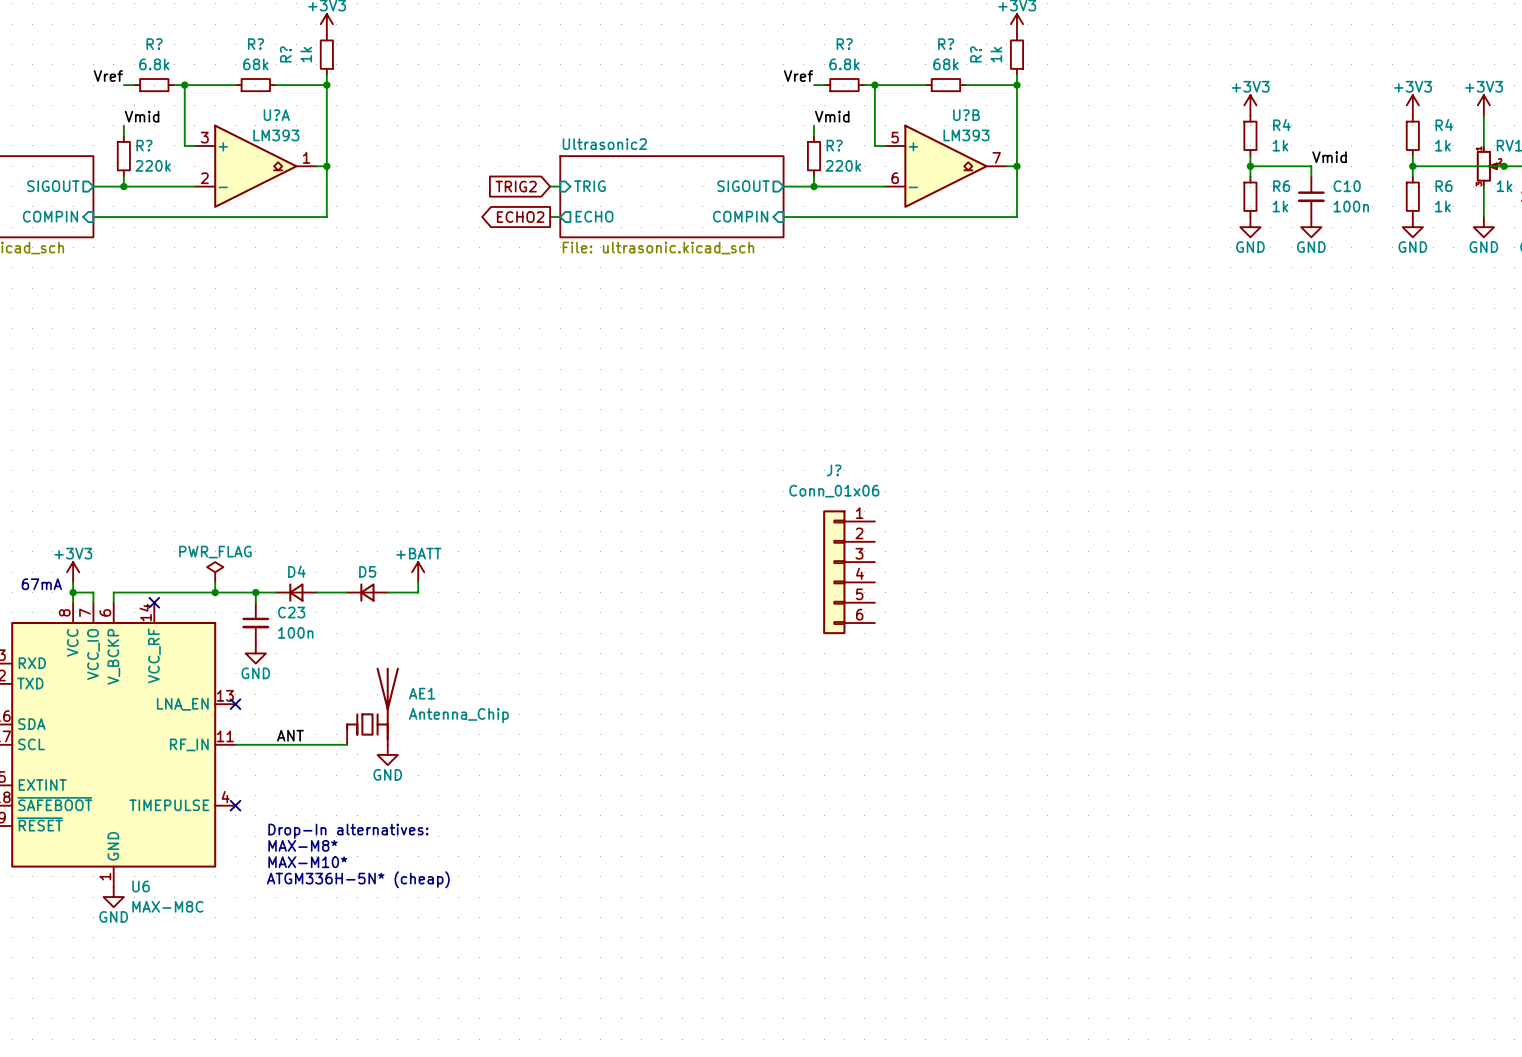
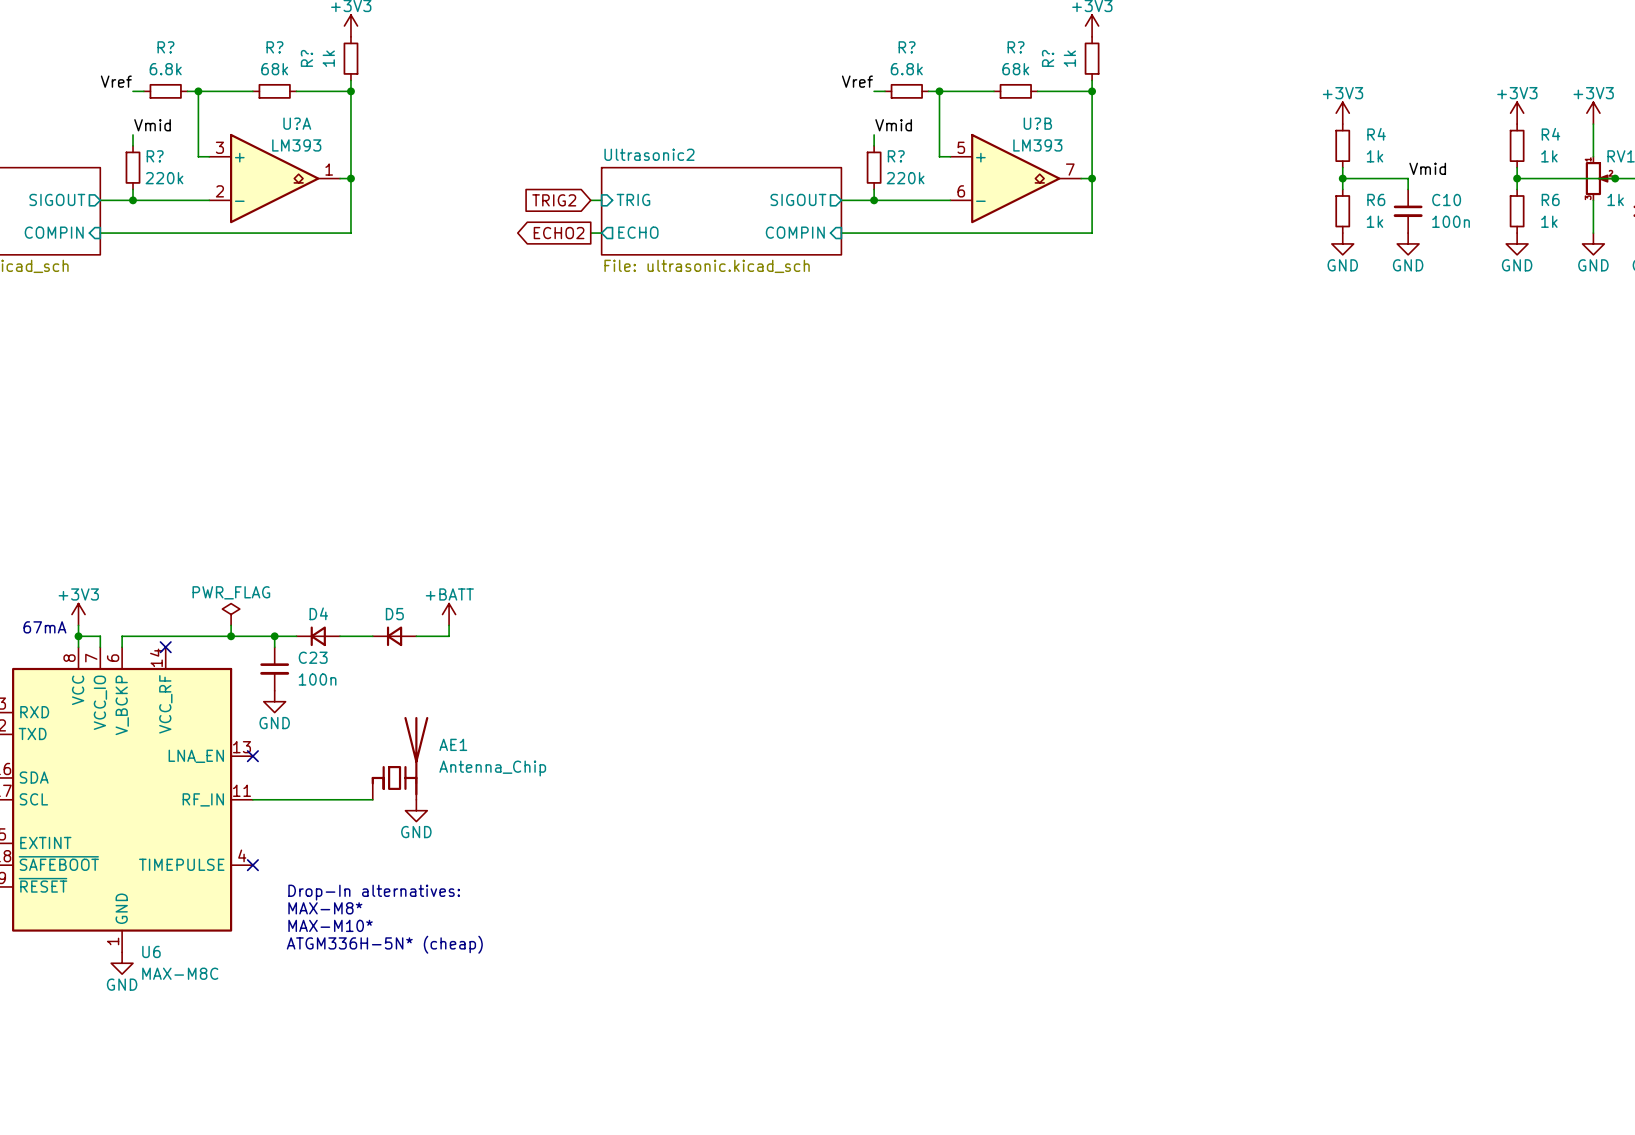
J?: Conn_01x06 (849, 572) -> none
label: ANT (290, 735) -> none

